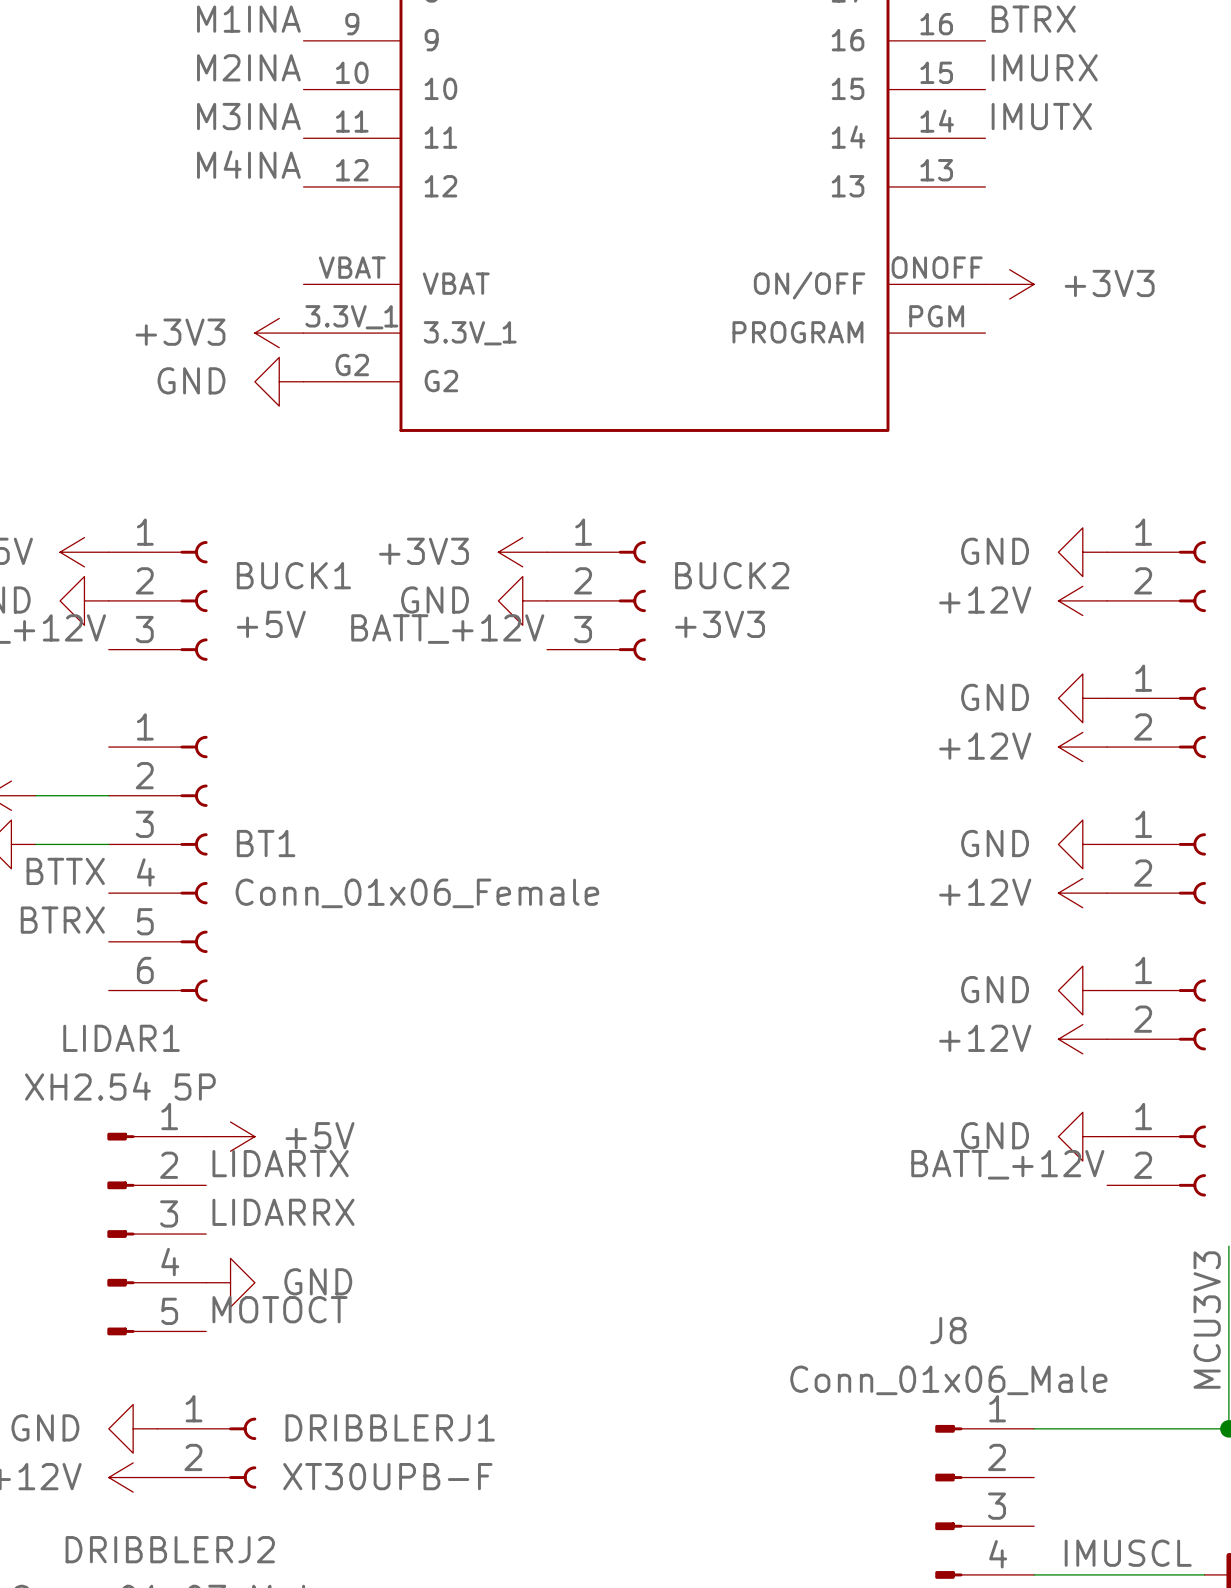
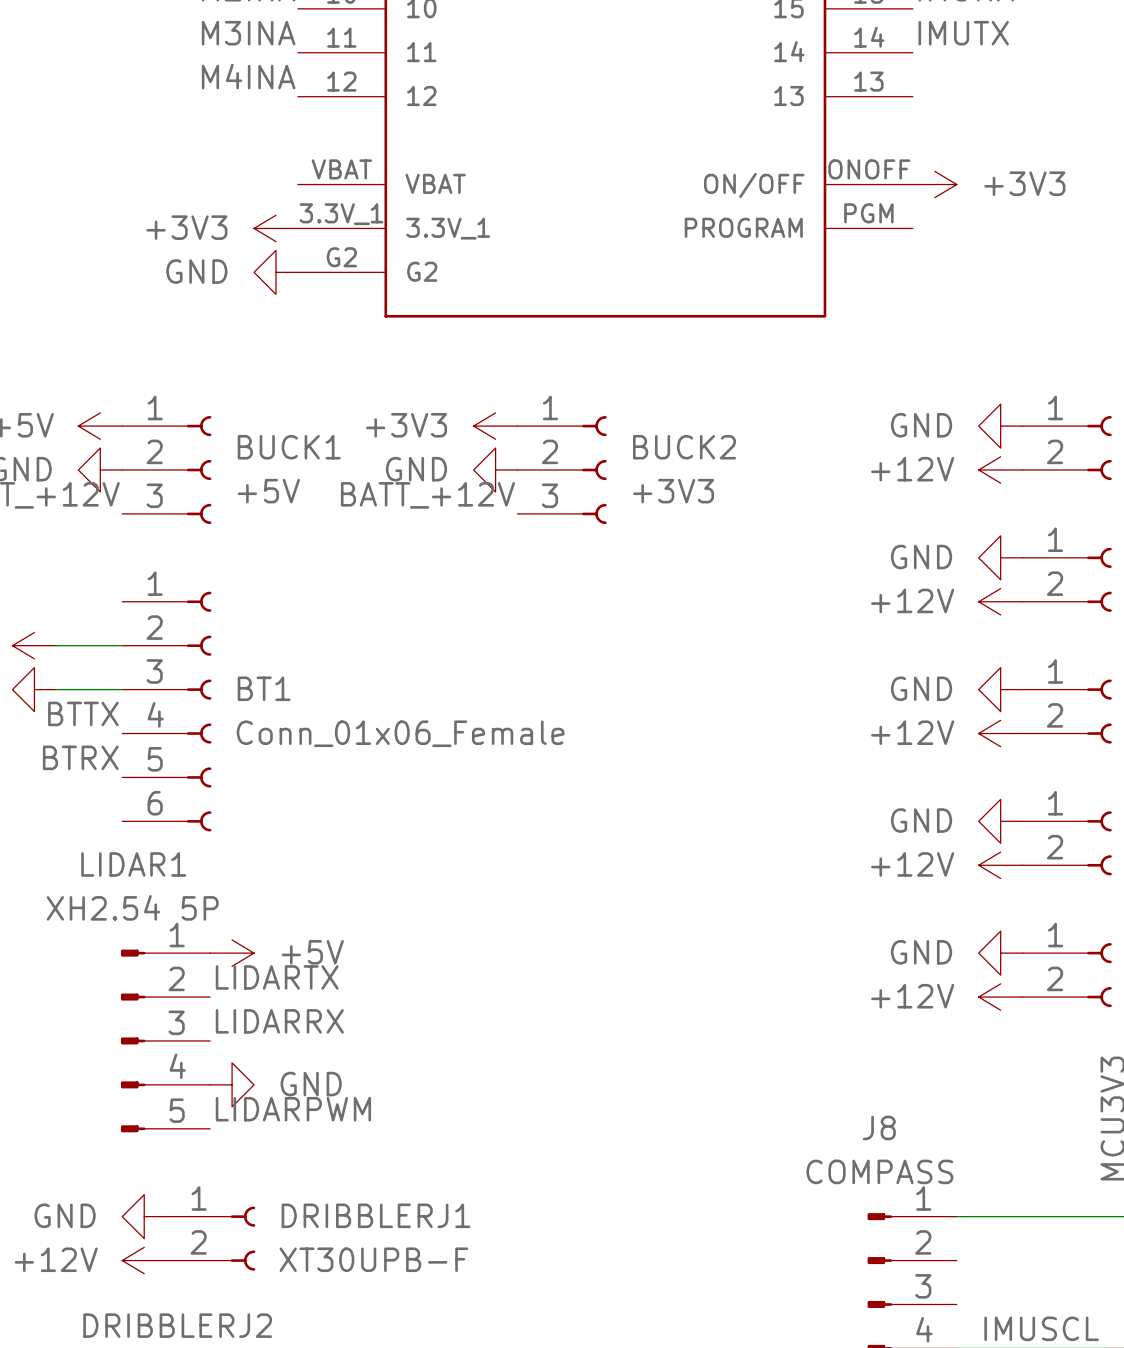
label: BATT_+12V (1007, 1164) -> none
power symbol: none -> +12V (1000, 997)
label: MOTOCT (280, 1309) -> LIDARPWM (293, 1109)
J8 value: Conn_01x06_Male (948, 1380) -> COMPASS (879, 1171)

